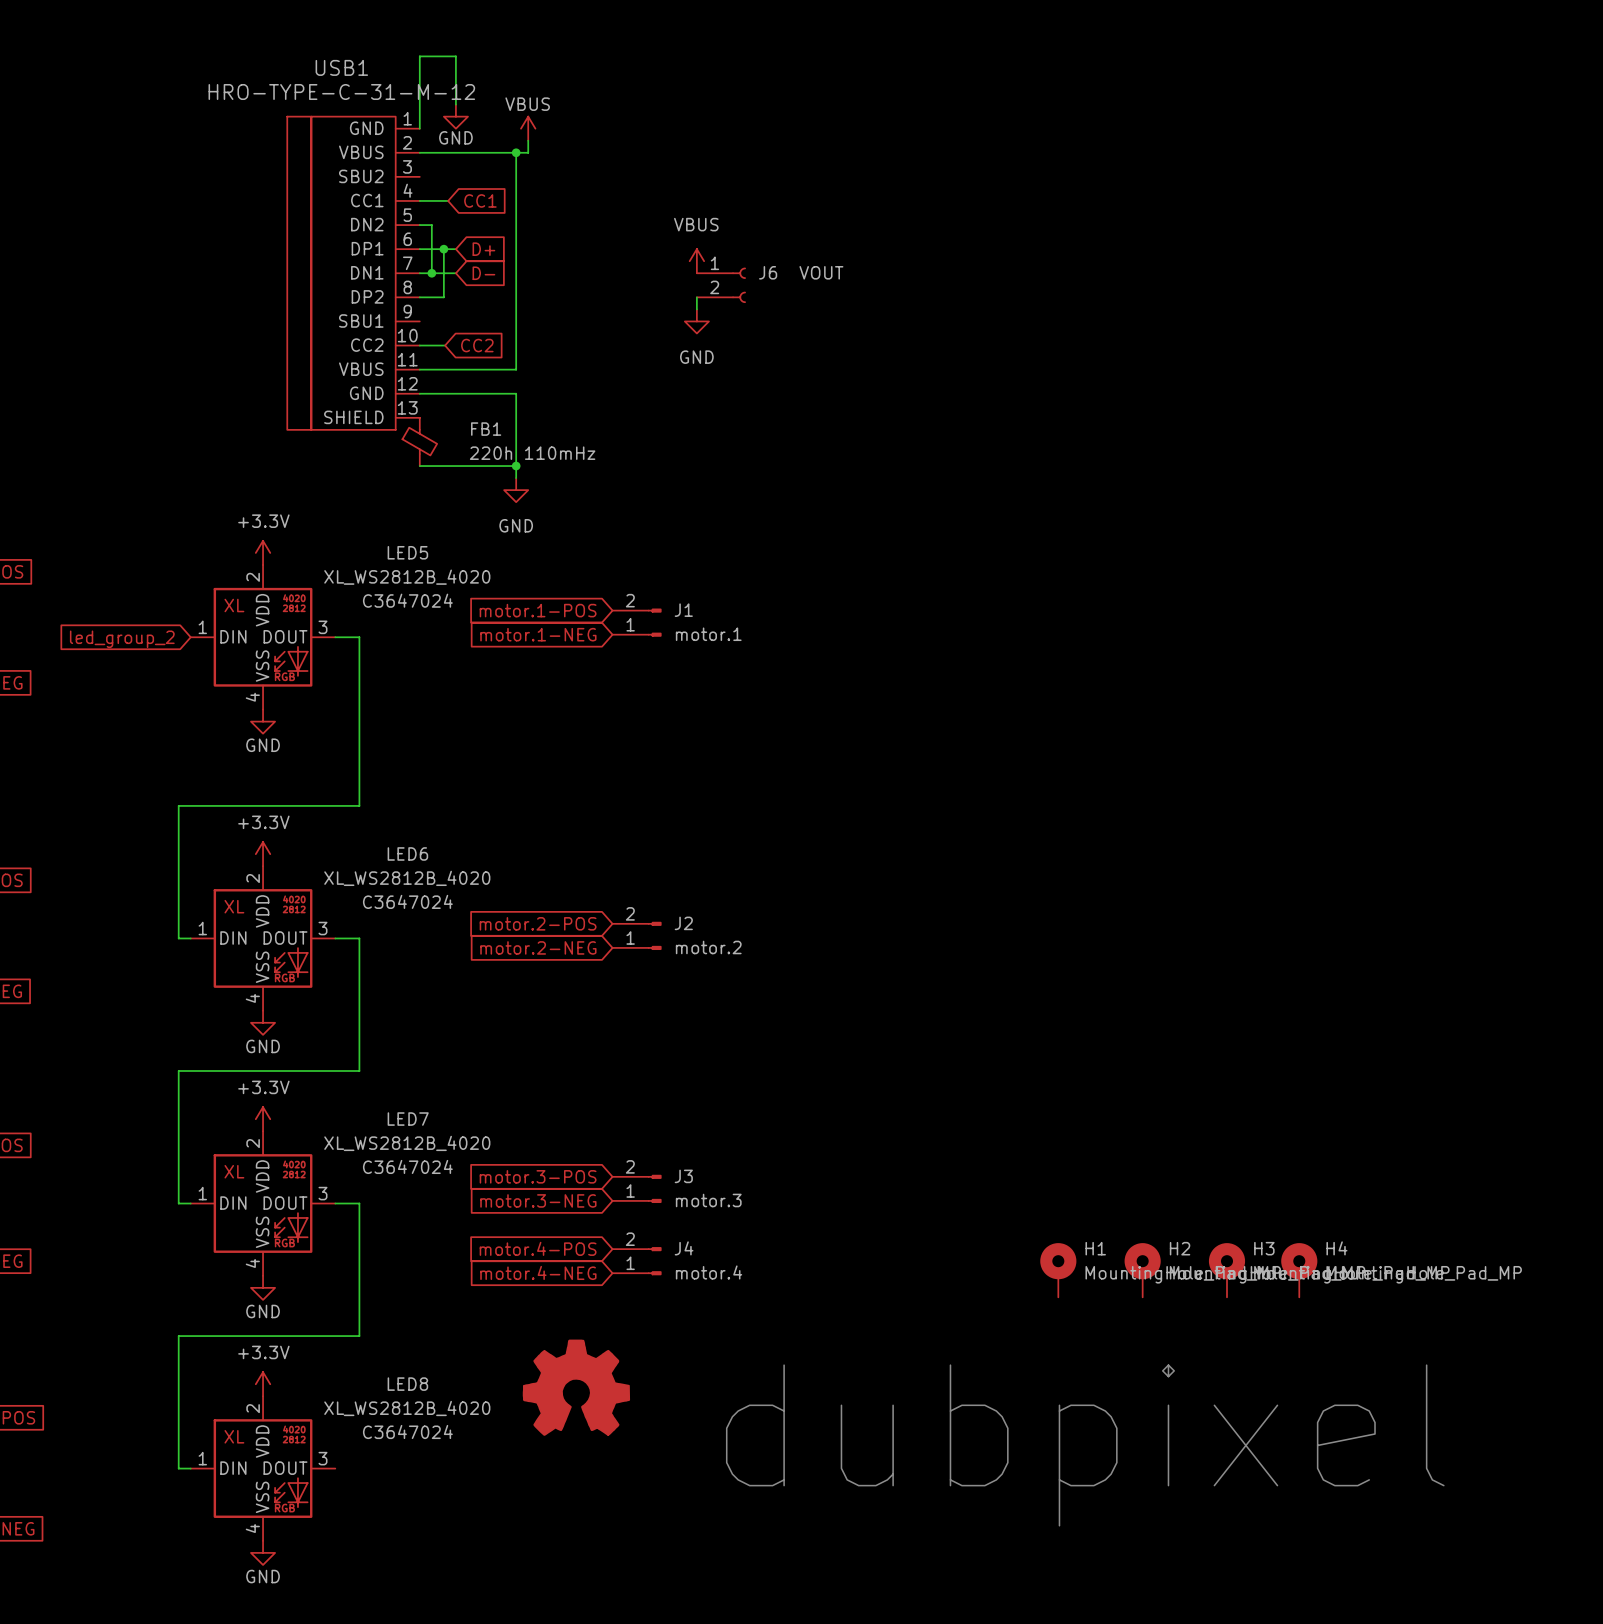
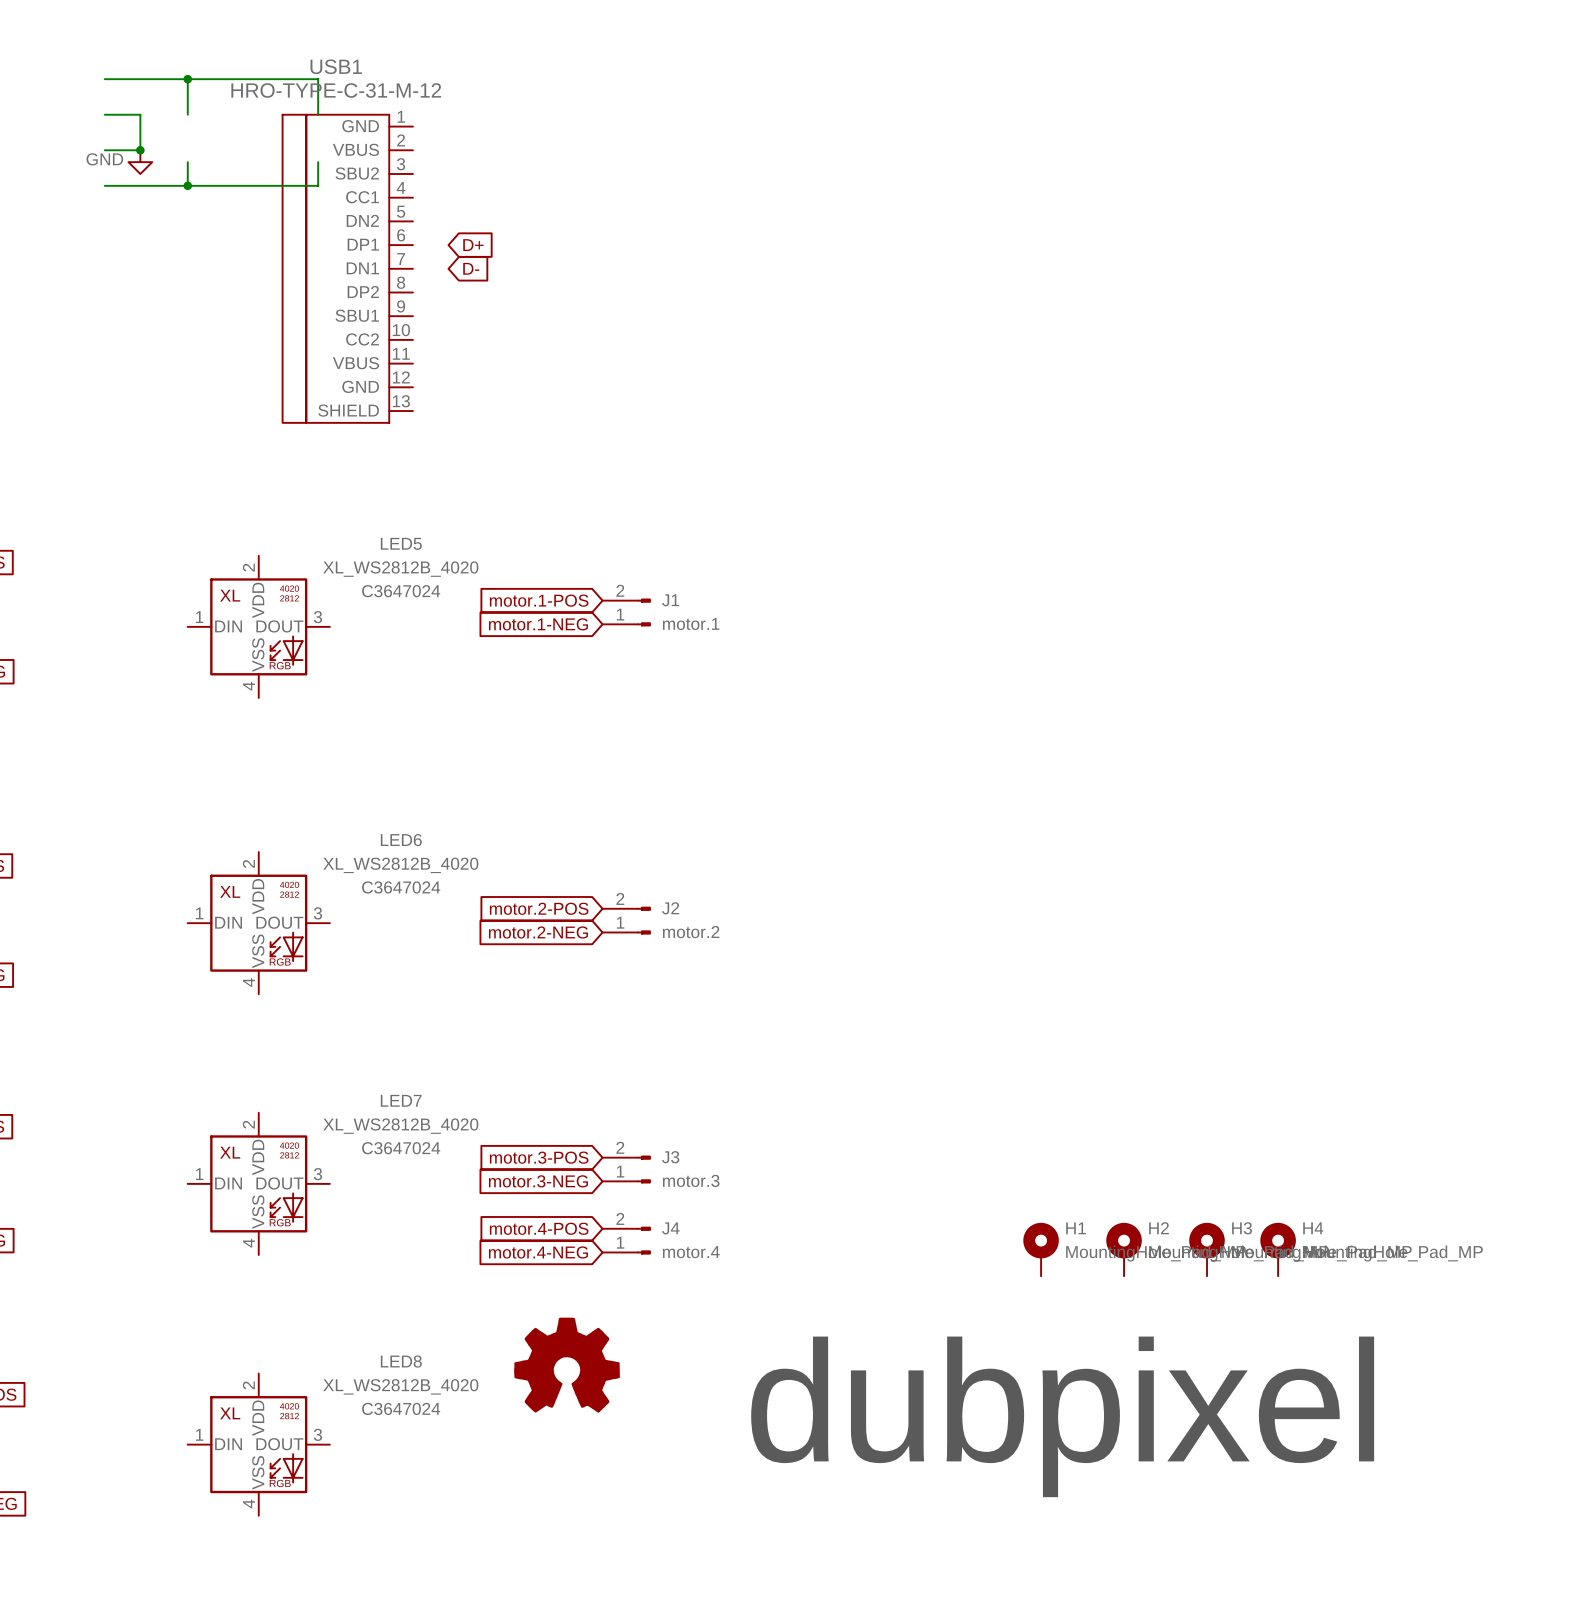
wire: none -> (104, 79) (318, 79) (318, 114)
wire: none -> (187, 79) (187, 114)
junction: none -> (187, 79)
wire: (455, 104) (455, 56) (419, 56) (419, 128) -> none
wire: none -> (104, 114) (140, 114) (140, 150) (104, 150)
power symbol: GND (455, 116) -> none
power symbol: VBUS (528, 128) -> none
wire: (528, 140) (528, 152) (419, 152) -> none
junction: none -> (140, 150)
wire: (516, 152) (516, 369) (419, 369) -> none
junction: (516, 152) -> none
power symbol: none -> GND (140, 162)
wire: none -> (187, 162) (187, 185)
wire: none -> (318, 162) (318, 185) (104, 185)
junction: none -> (187, 185)
wire: (419, 200) (448, 200) -> none
global label: CC1 (480, 200) -> none
wire: (419, 225) (431, 225) (431, 273) -> none
wire: (419, 249) (455, 249) -> none
wire: (443, 249) (443, 297) (419, 297) -> none
junction: (443, 249) -> none
power symbol: VBUS (696, 261) -> none
wire: (419, 273) (455, 273) -> none
junction: (431, 273) -> none
J6: VOUT (721, 285) -> none
wire: (696, 297) (696, 309) -> none
power symbol: GND (696, 321) -> none
wire: (419, 345) (445, 345) -> none
global label: CC2 (477, 345) -> none
wire: (419, 393) (516, 393) (516, 478) -> none
FB1: 220h 110mHz (419, 441) -> none
wire: (419, 466) (516, 466) -> none
junction: (516, 466) -> none
power symbol: GND (516, 490) -> none
power symbol: +3.3V (263, 552) -> none
wire: (335, 637) (359, 637) (359, 805) (178, 805) (178, 938) (190, 938) -> none
global label: led_group_2 (122, 639) -> none
power symbol: GND (263, 721) -> none
power symbol: +3.3V (263, 854) -> none
wire: (335, 938) (359, 938) (359, 1070) (178, 1070) (178, 1203) (190, 1203) -> none
power symbol: GND (263, 1022) -> none
power symbol: +3.3V (263, 1119) -> none
wire: (335, 1203) (359, 1203) (359, 1336) (178, 1336) (178, 1468) (190, 1468) -> none
power symbol: GND (263, 1287) -> none
power symbol: +3.3V (263, 1384) -> none
power symbol: GND (263, 1552) -> none

